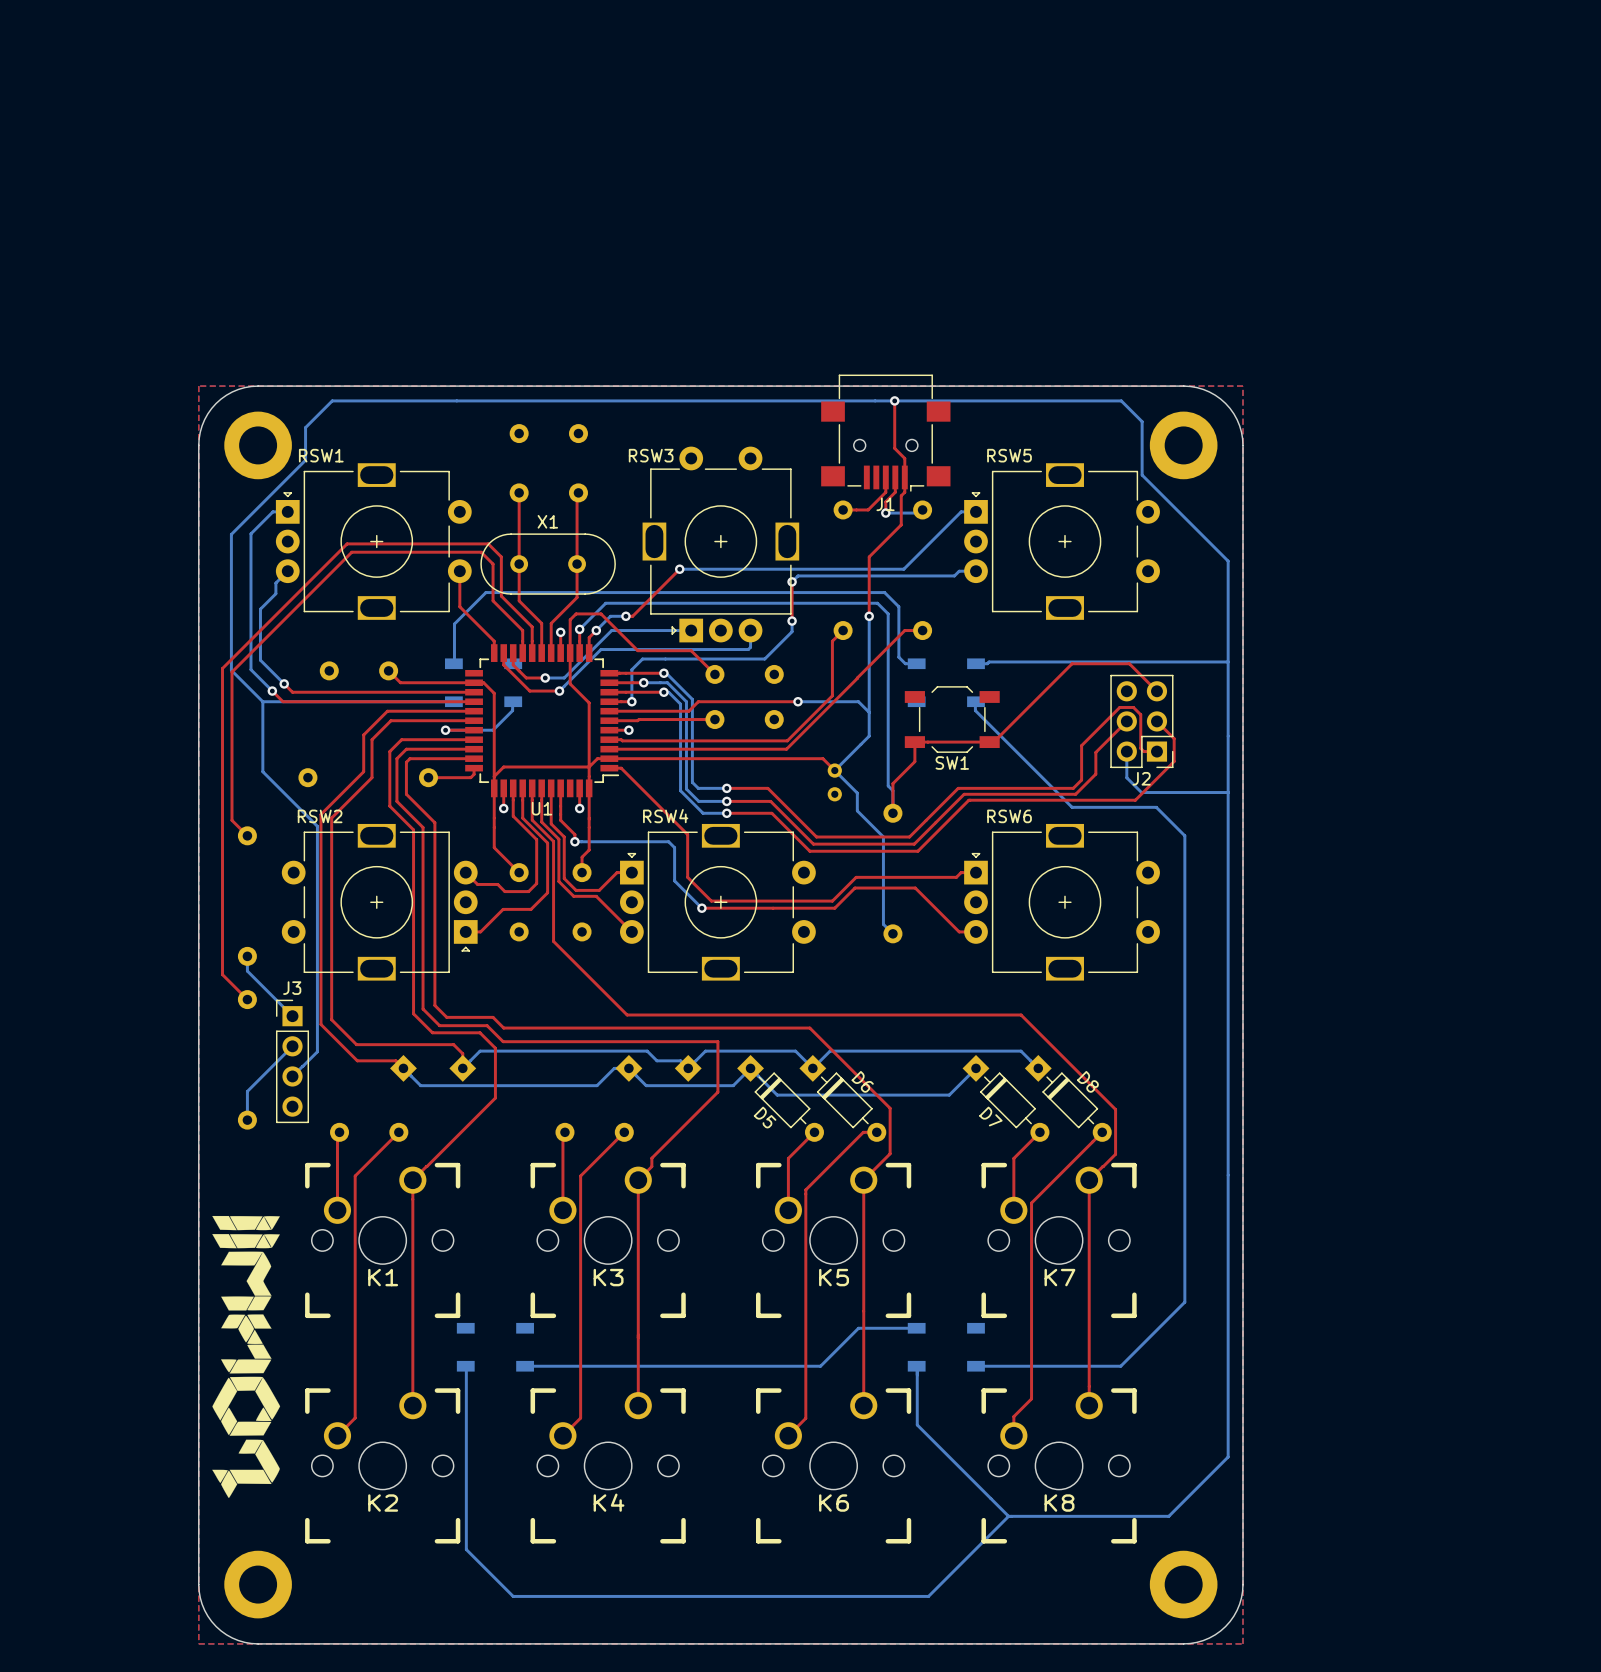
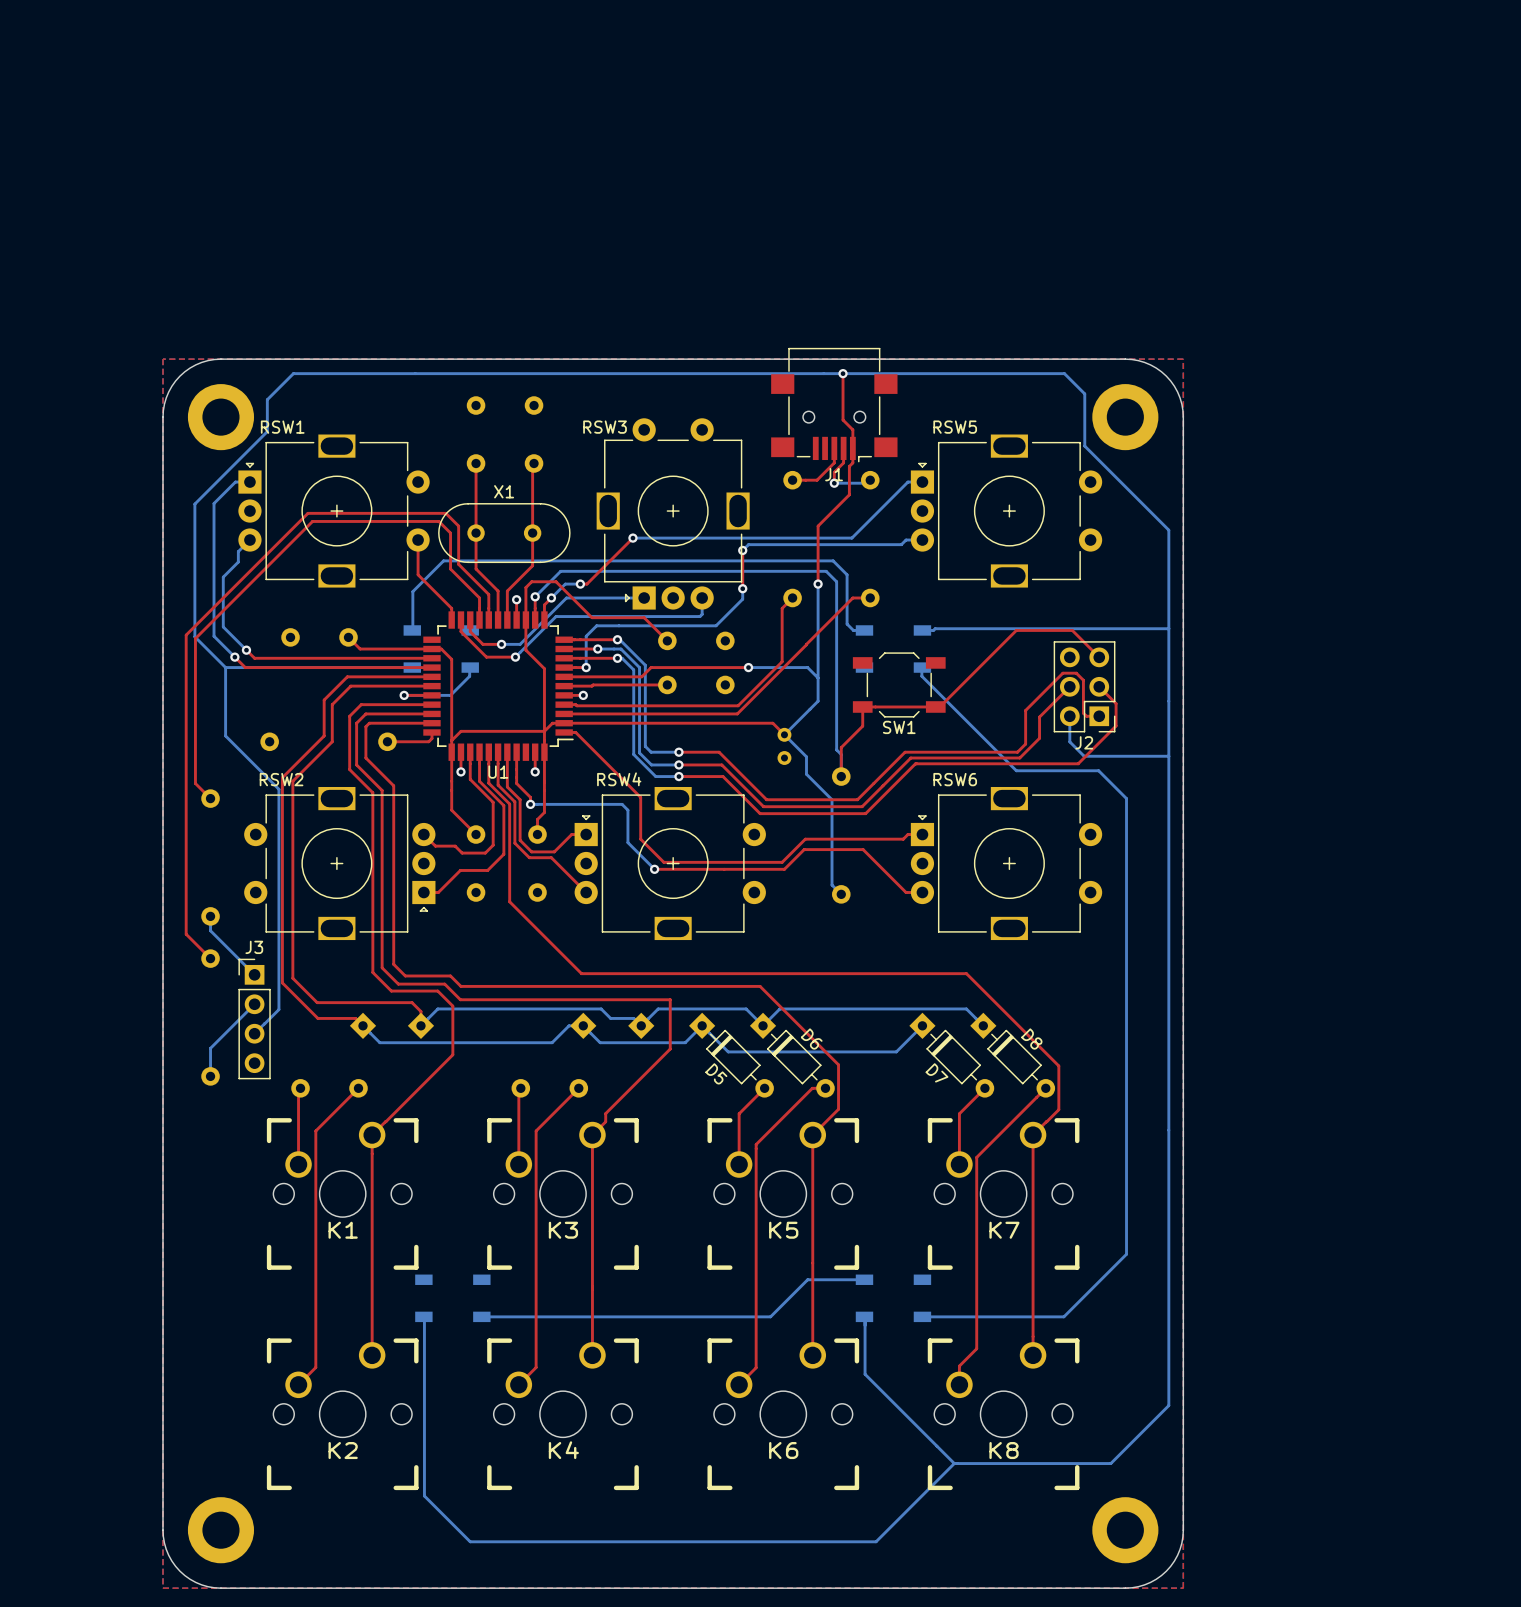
drawing: [212, 1215, 281, 1499] -> none

